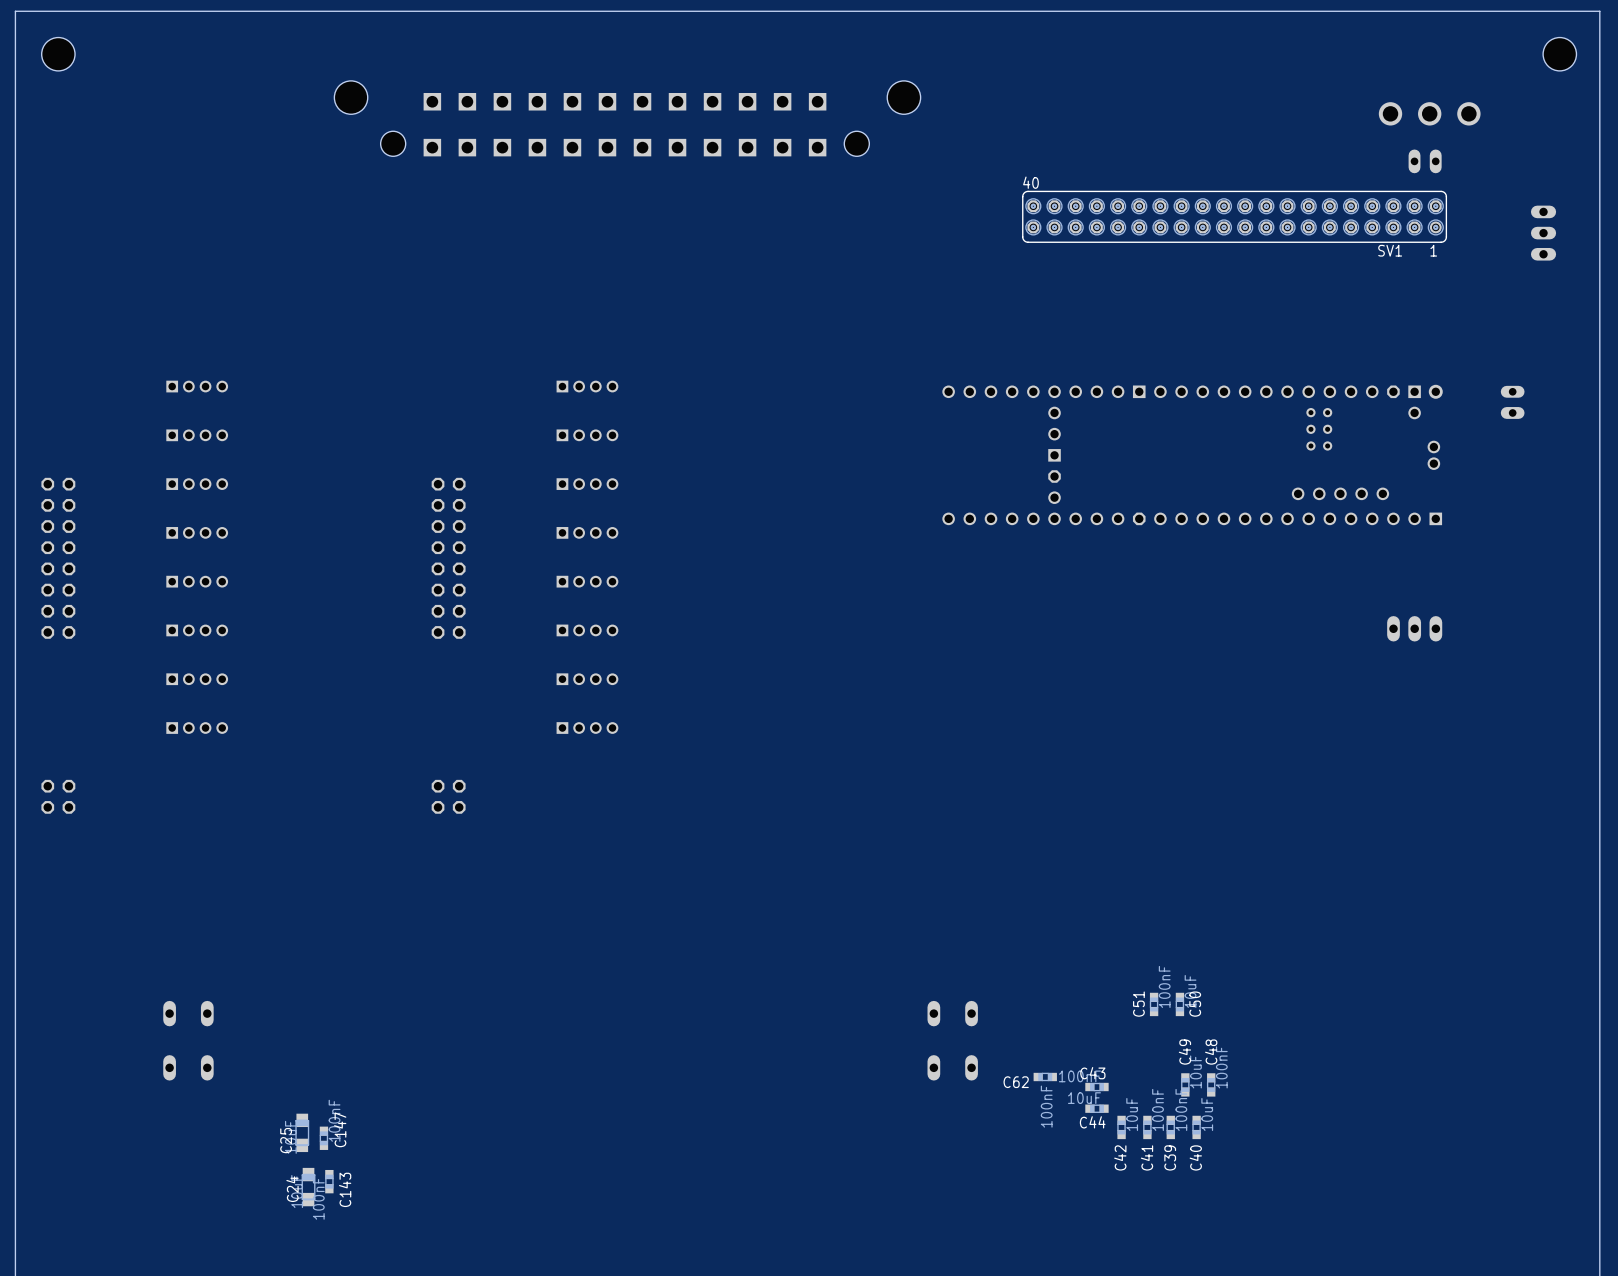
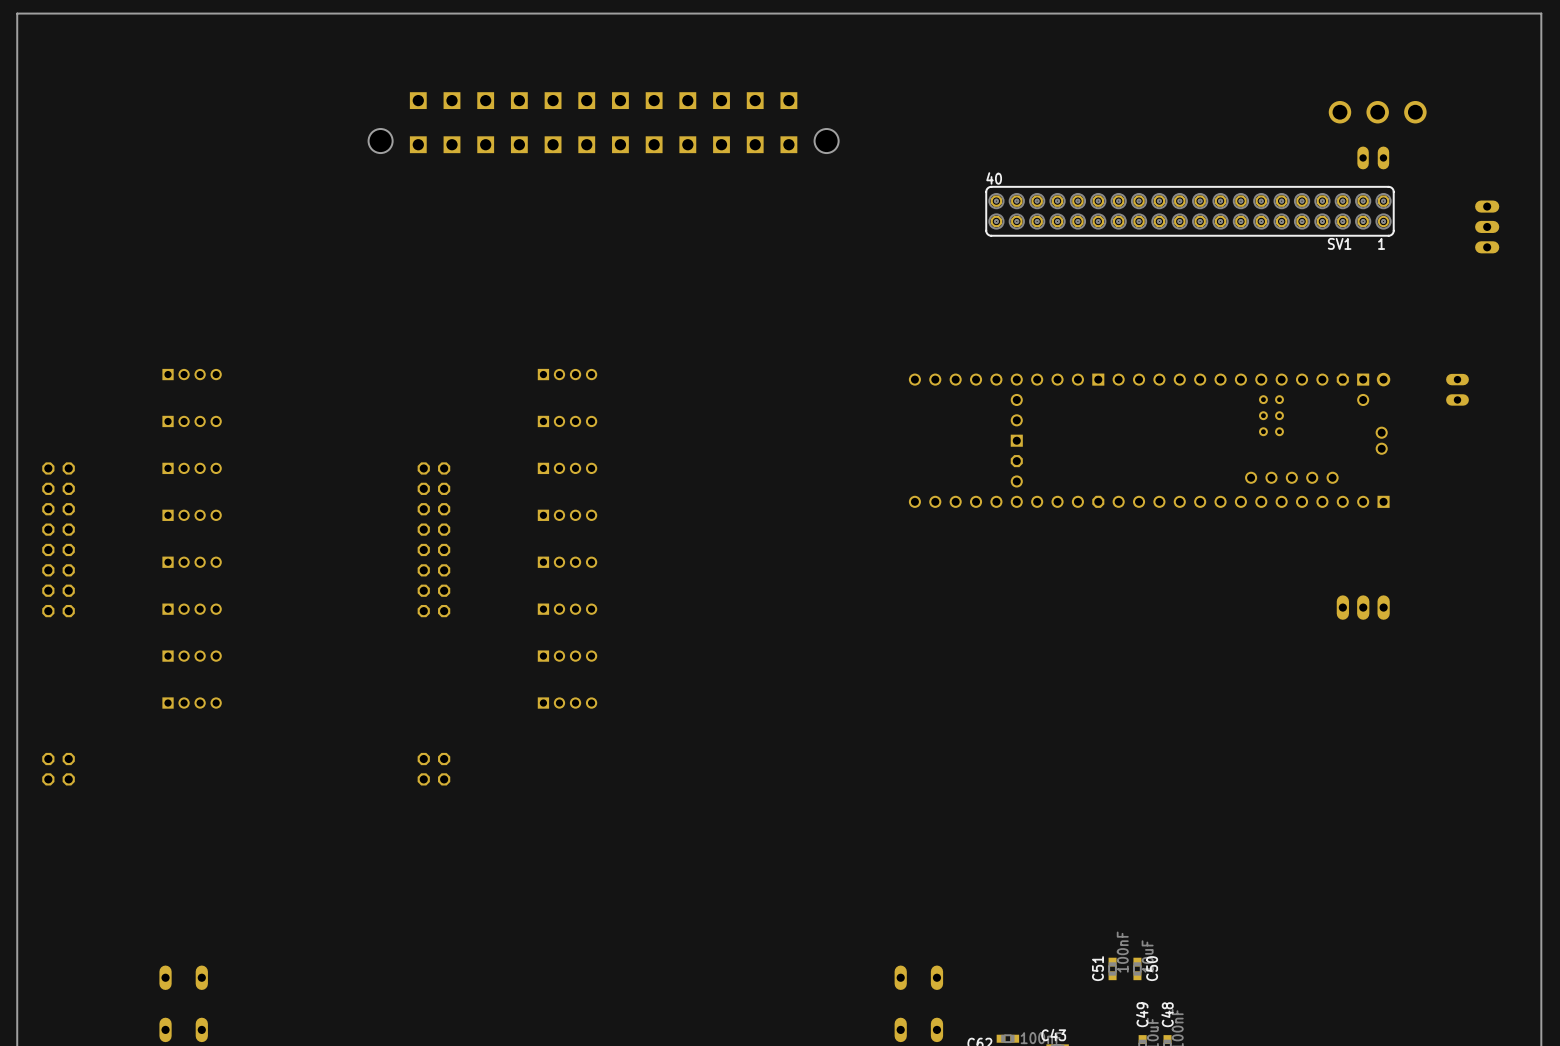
hole: (58, 54) -> none
hole: (1559, 54) -> none
hole: (351, 97) -> none
hole: (903, 97) -> none

